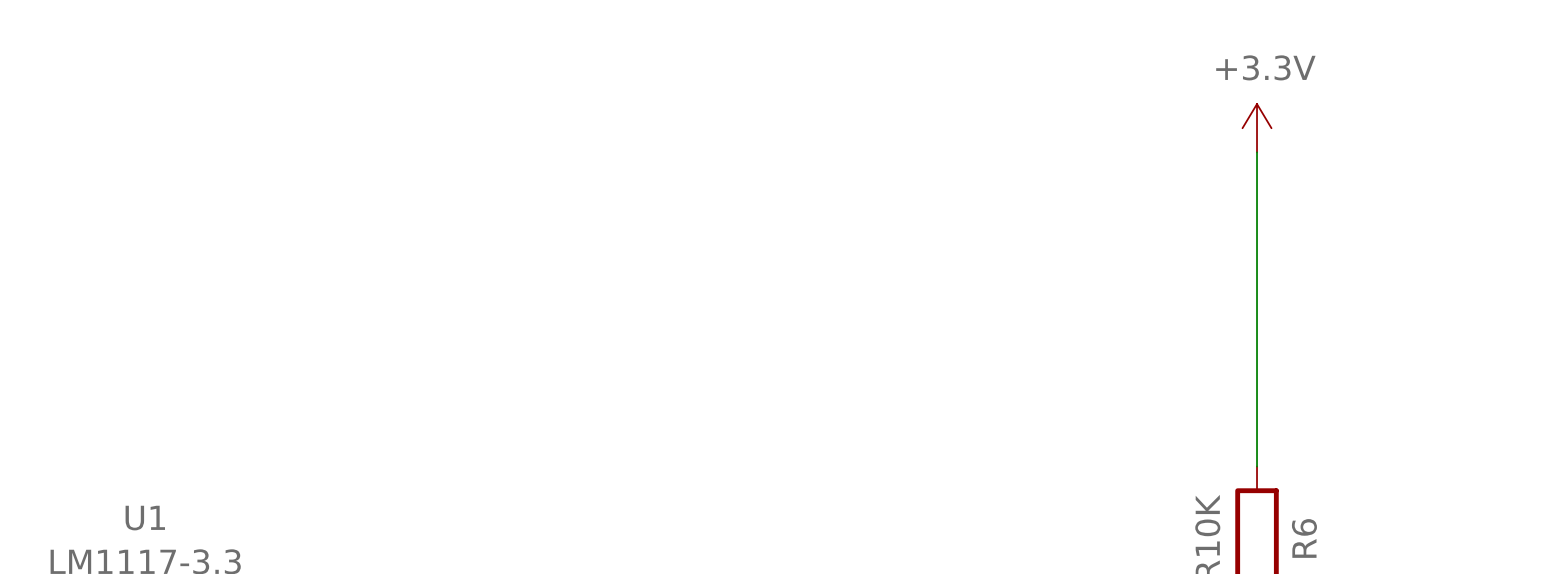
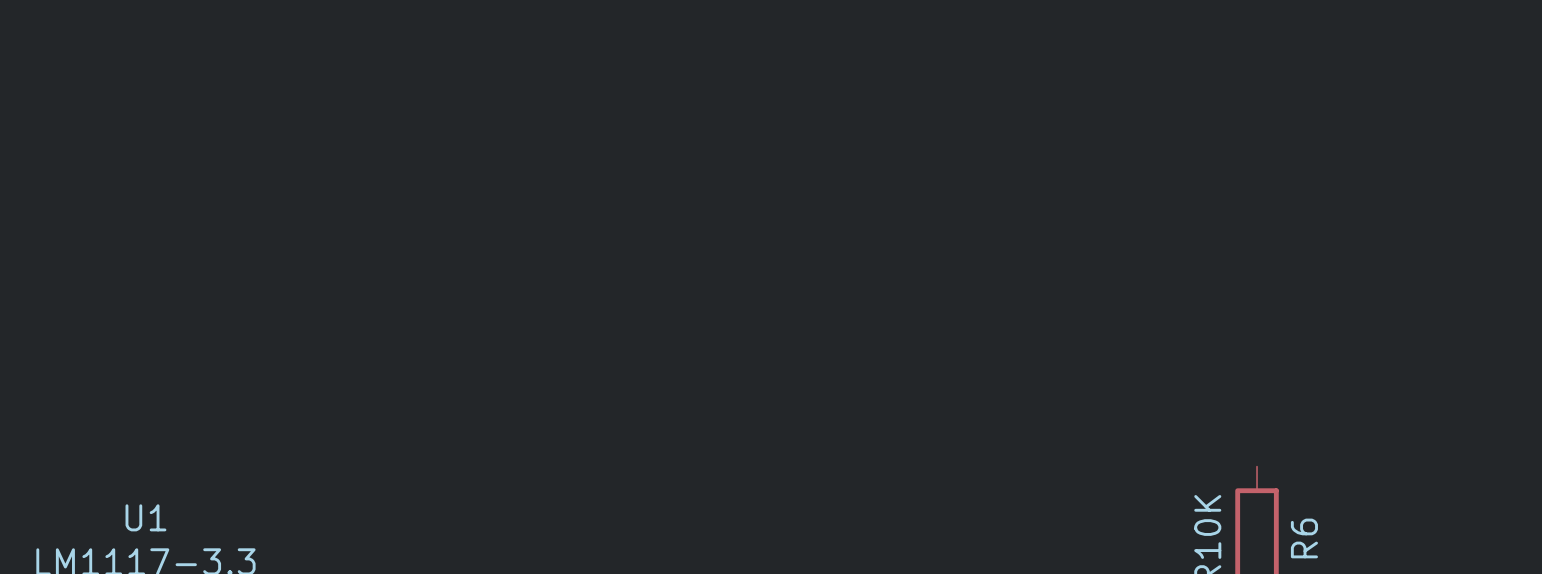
power symbol: +3.3V (1257, 128) -> none
wire: (1257, 152) (1257, 466) -> none

